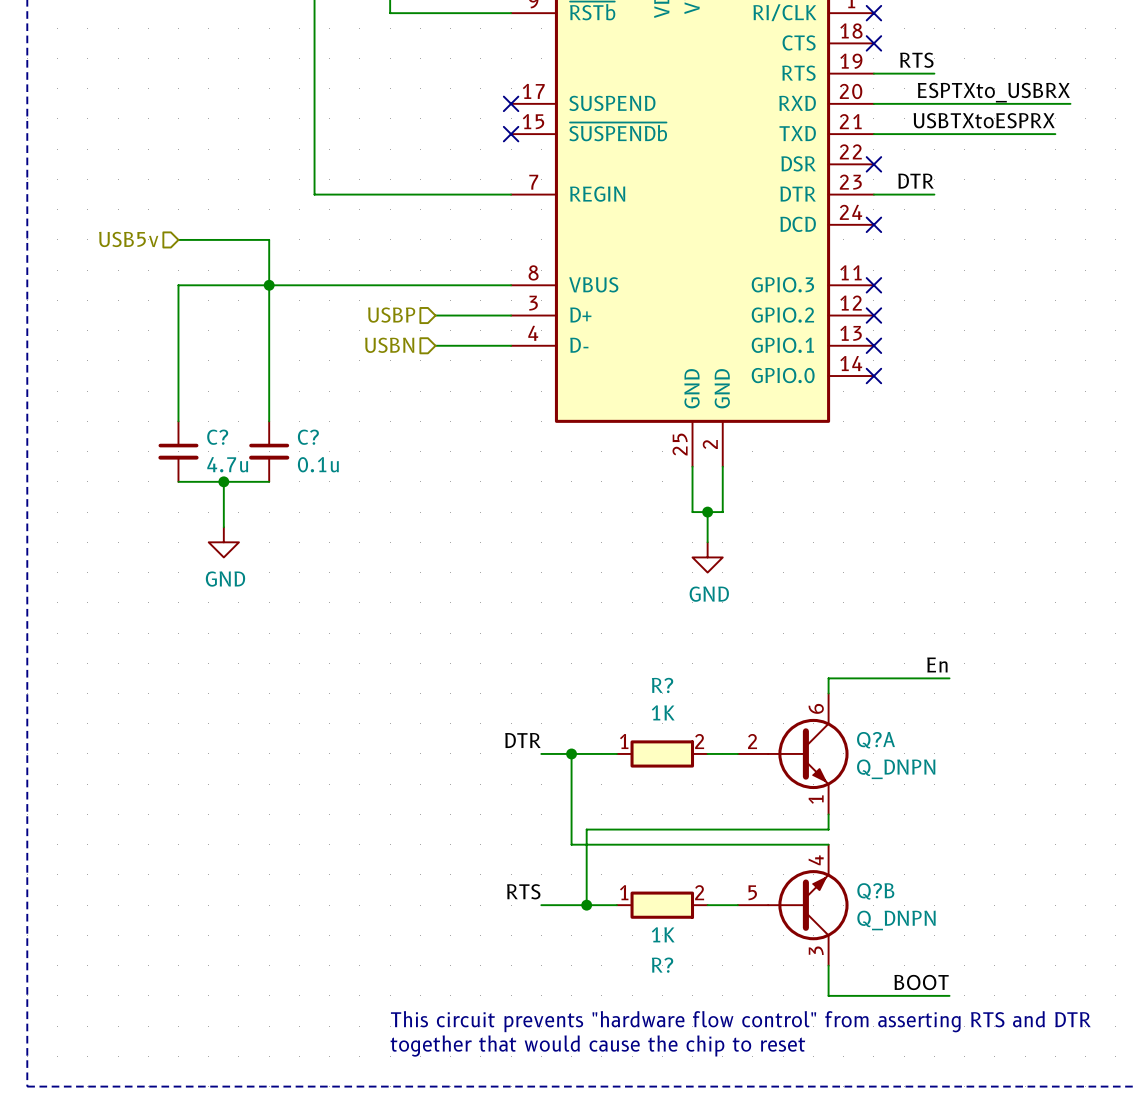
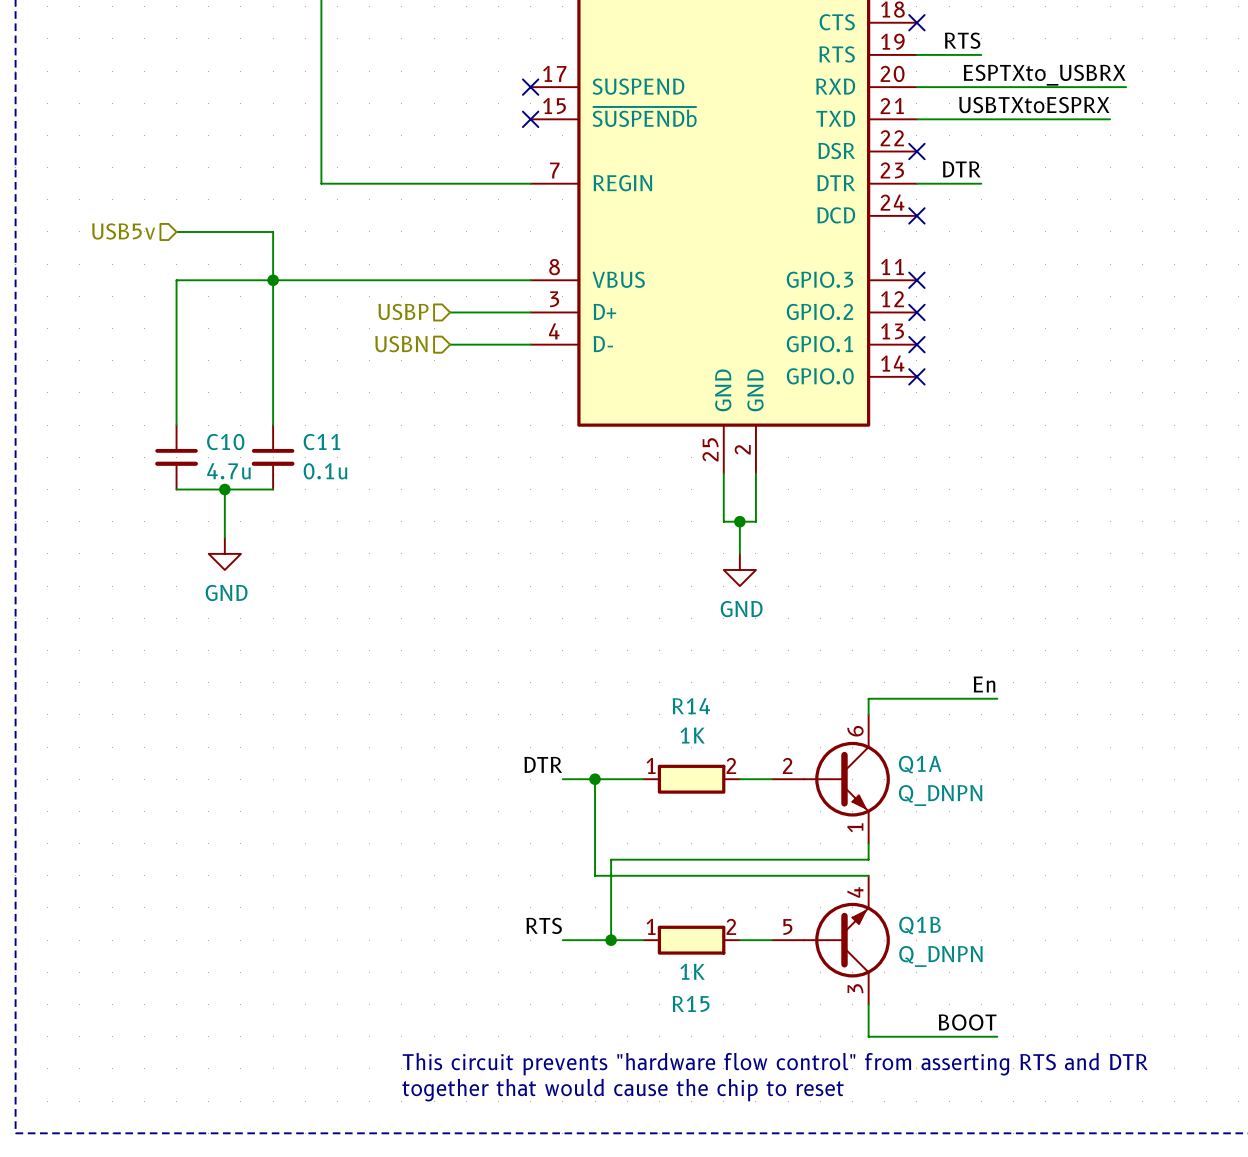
C? name: C? (217, 437) -> C10 (225, 442)
C? name: C? (308, 437) -> C11 (322, 442)
R? name: R? (662, 685) -> R14 (691, 706)
Q?A name: Q?A (875, 740) -> Q1A (920, 764)
Q?B name: Q?B (875, 891) -> Q1B (919, 925)
R? name: R? (662, 965) -> R15 (691, 1003)

